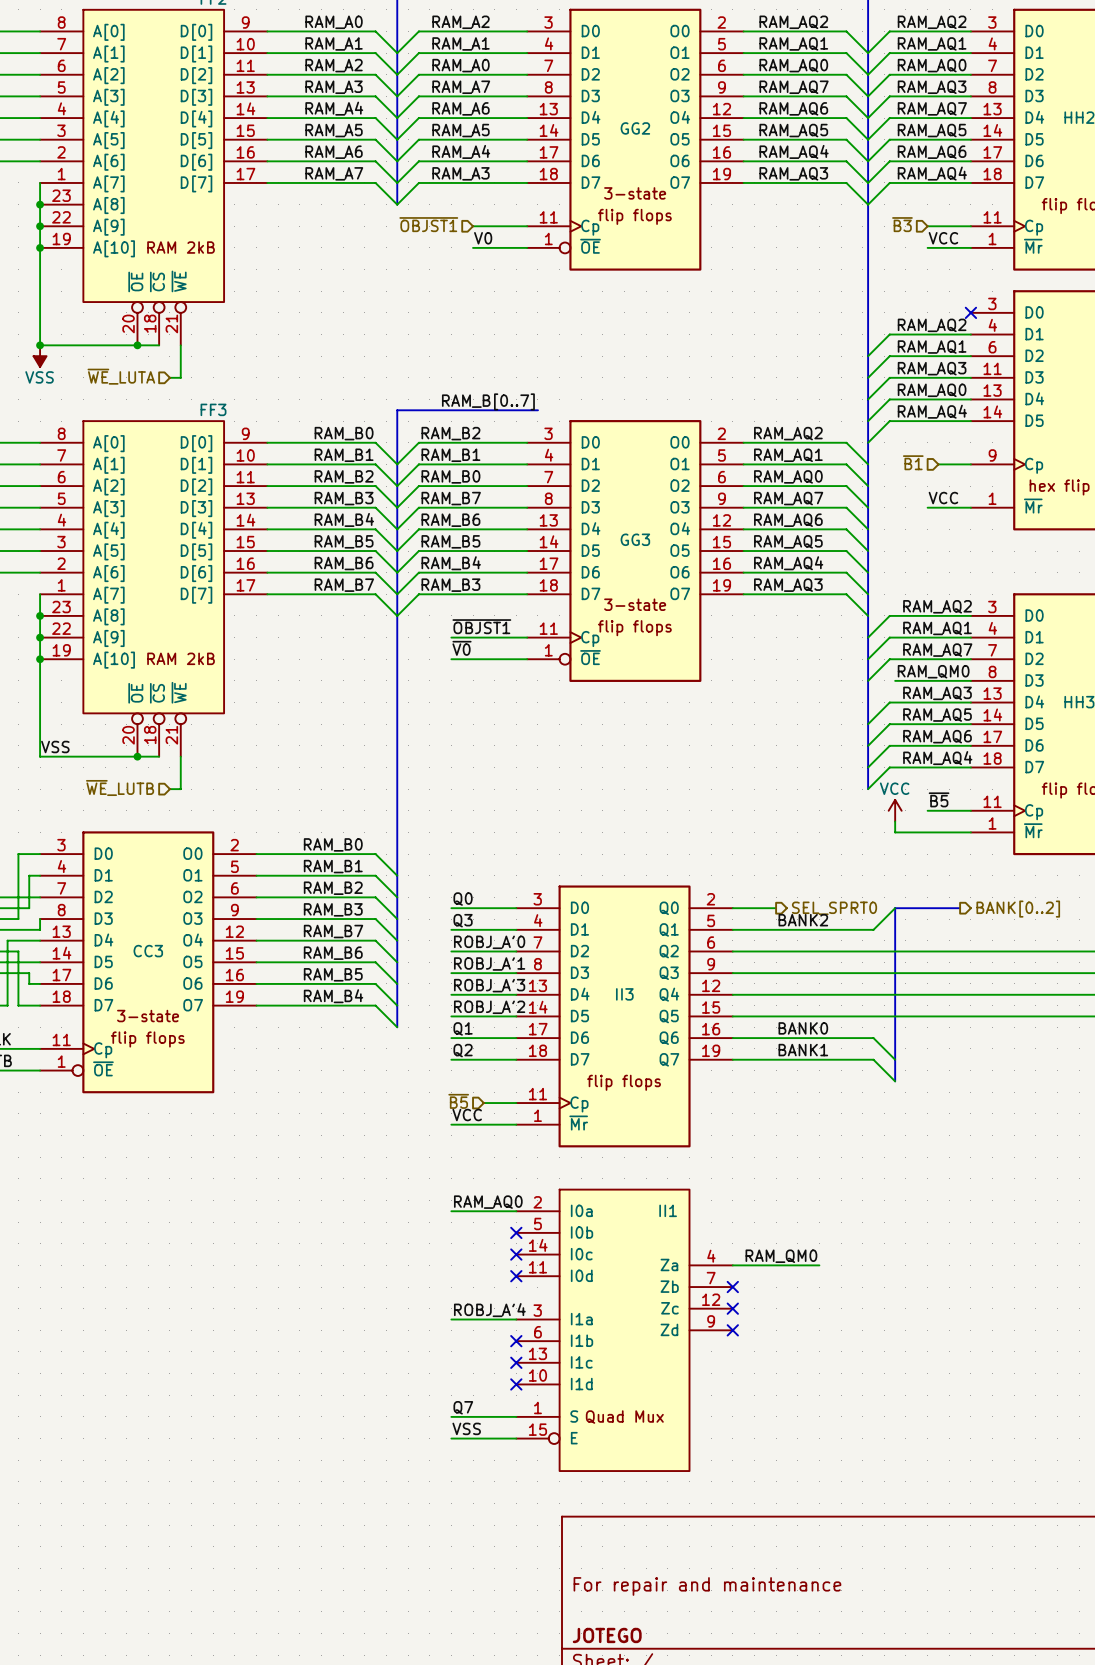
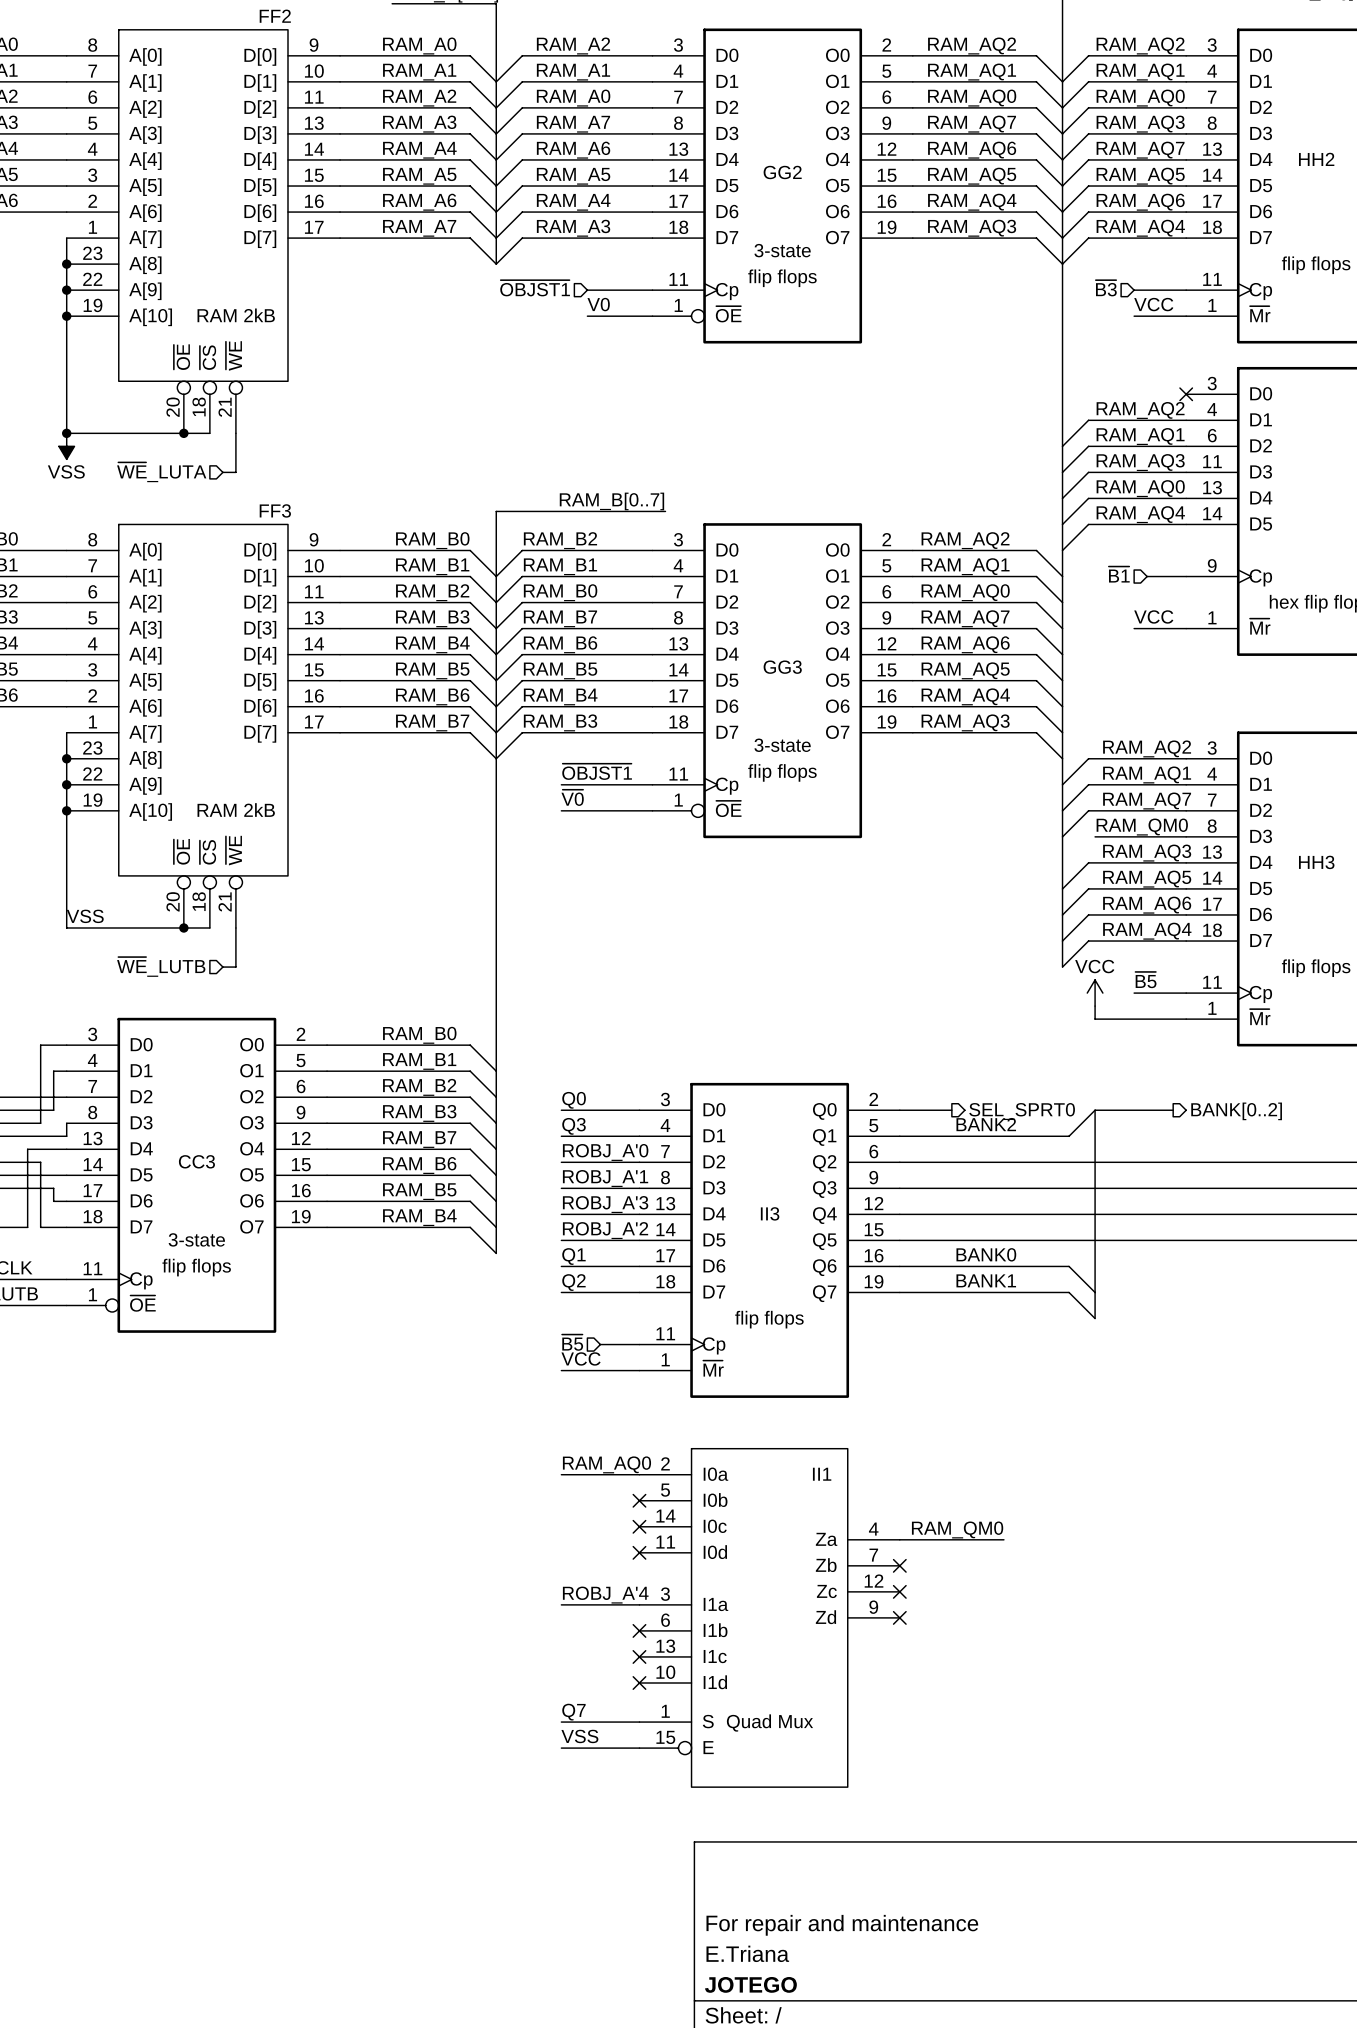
title block: none -> E.Triana (747, 1953)

